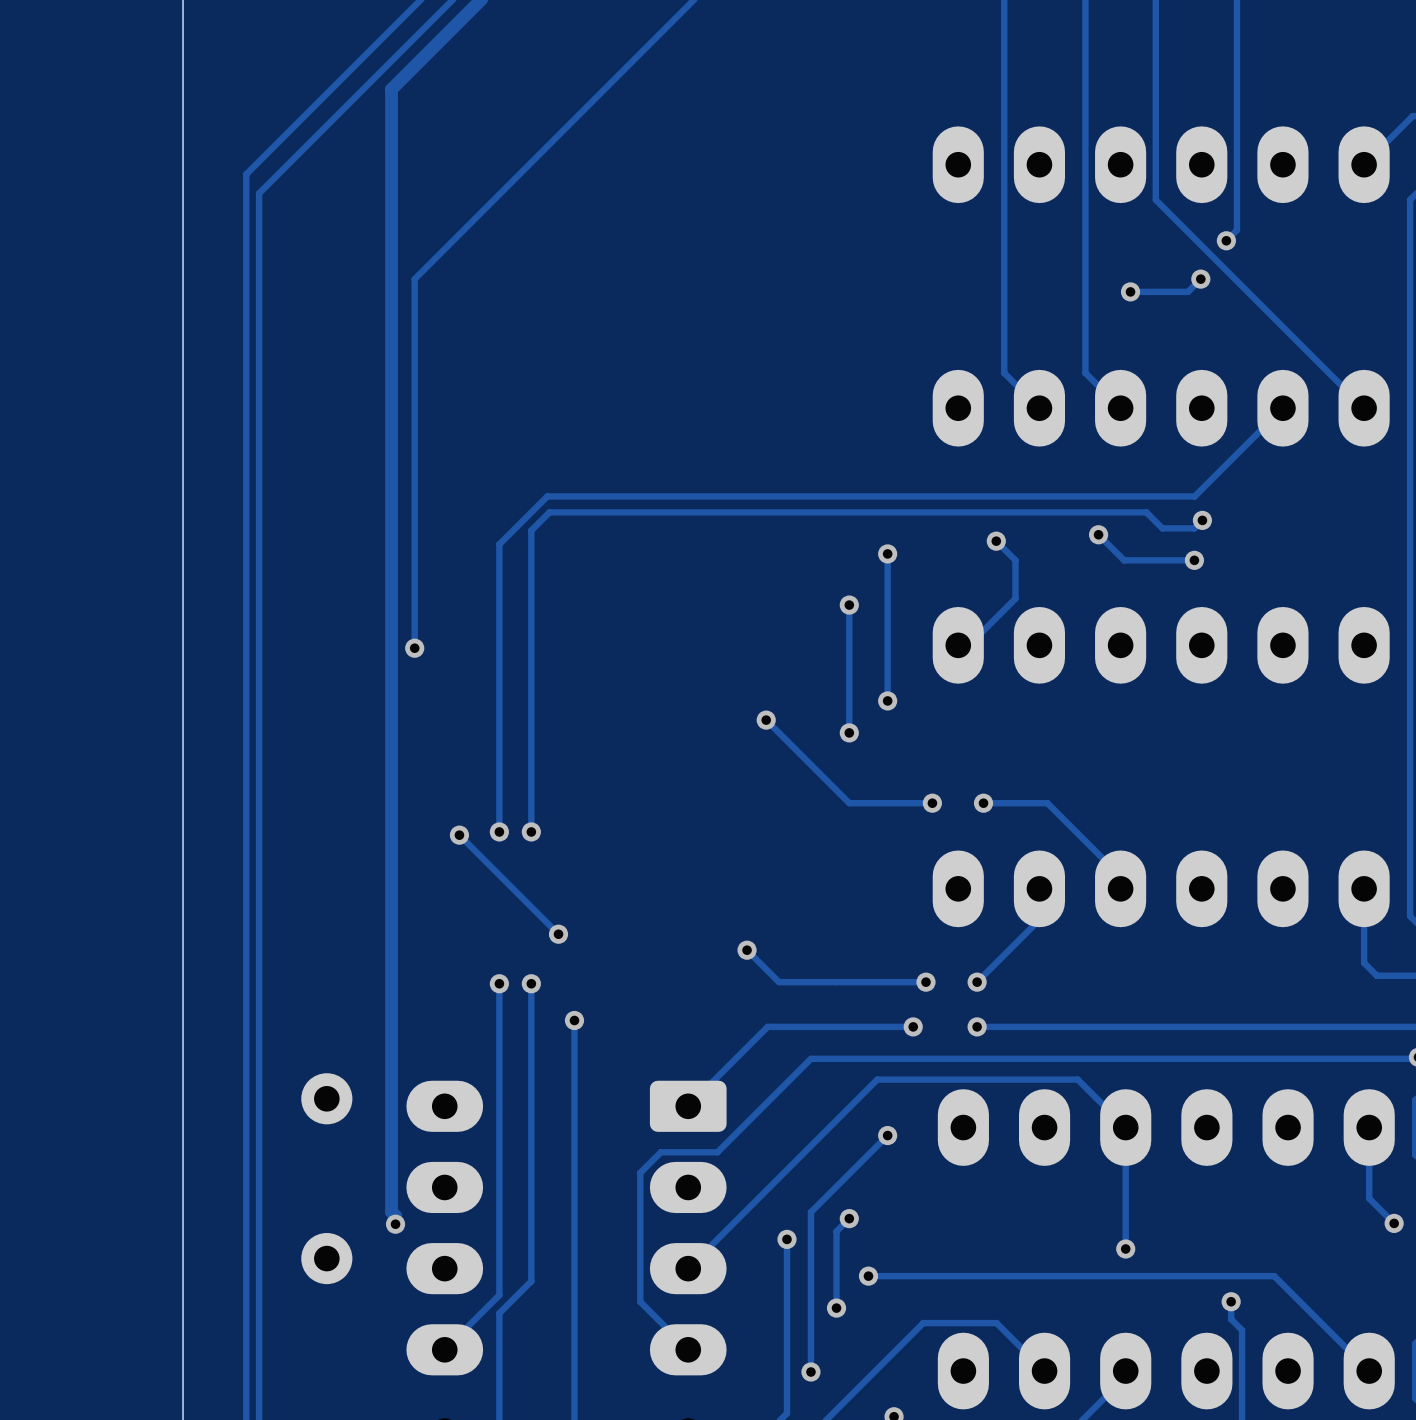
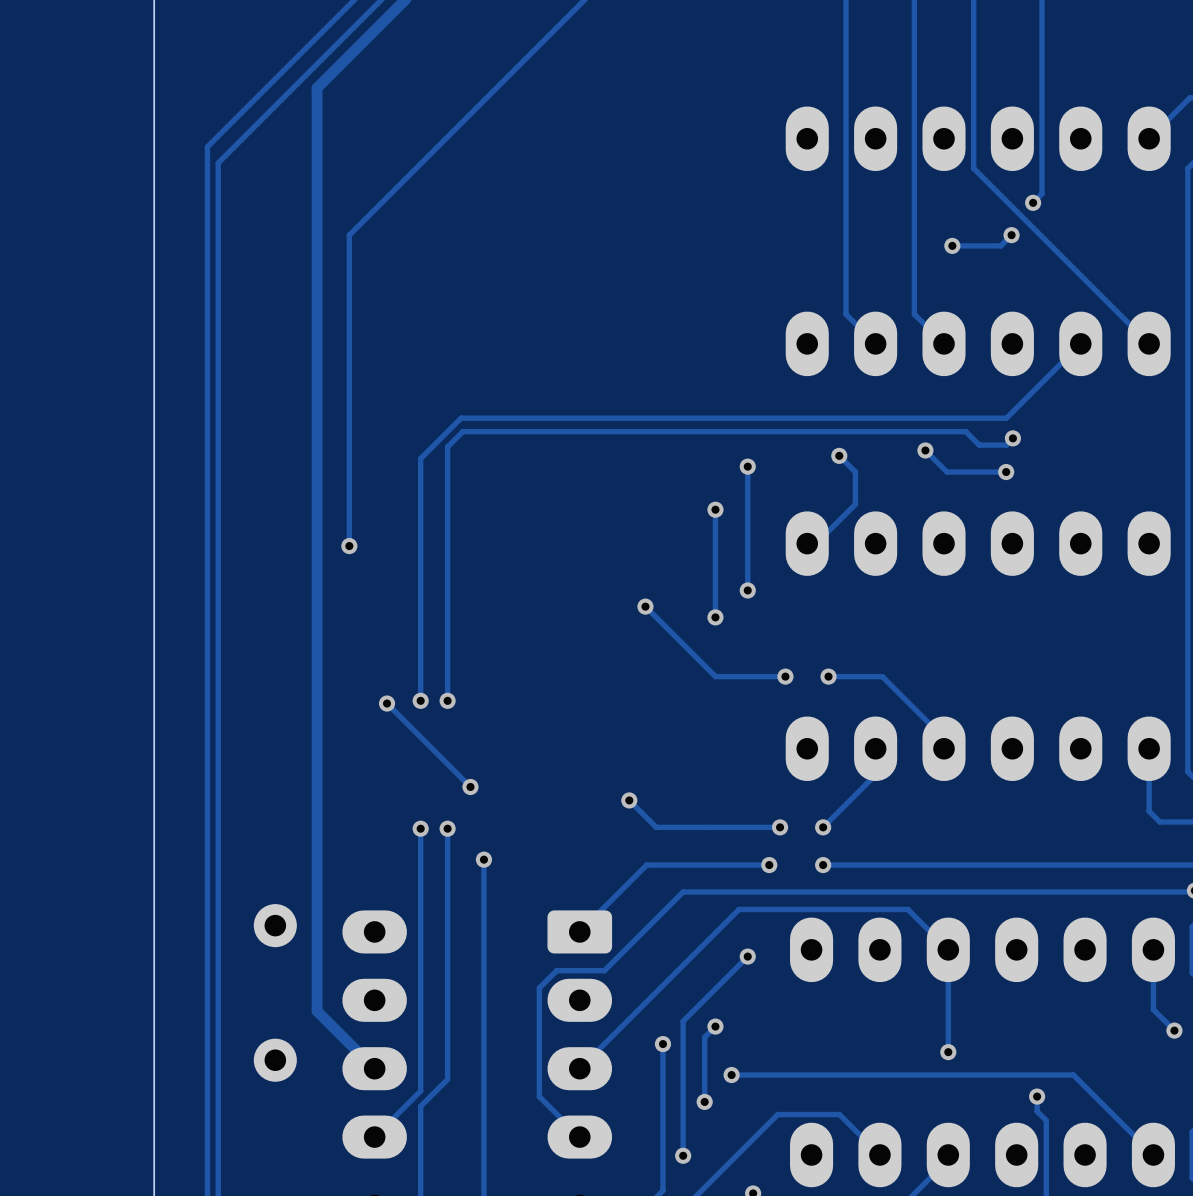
track: (391, 89) (391, 1211) (395, 1215) (395, 1224) -> (329, 75) (317, 88) (317, 1011) (374, 1068)
via: (395, 1224) -> none

